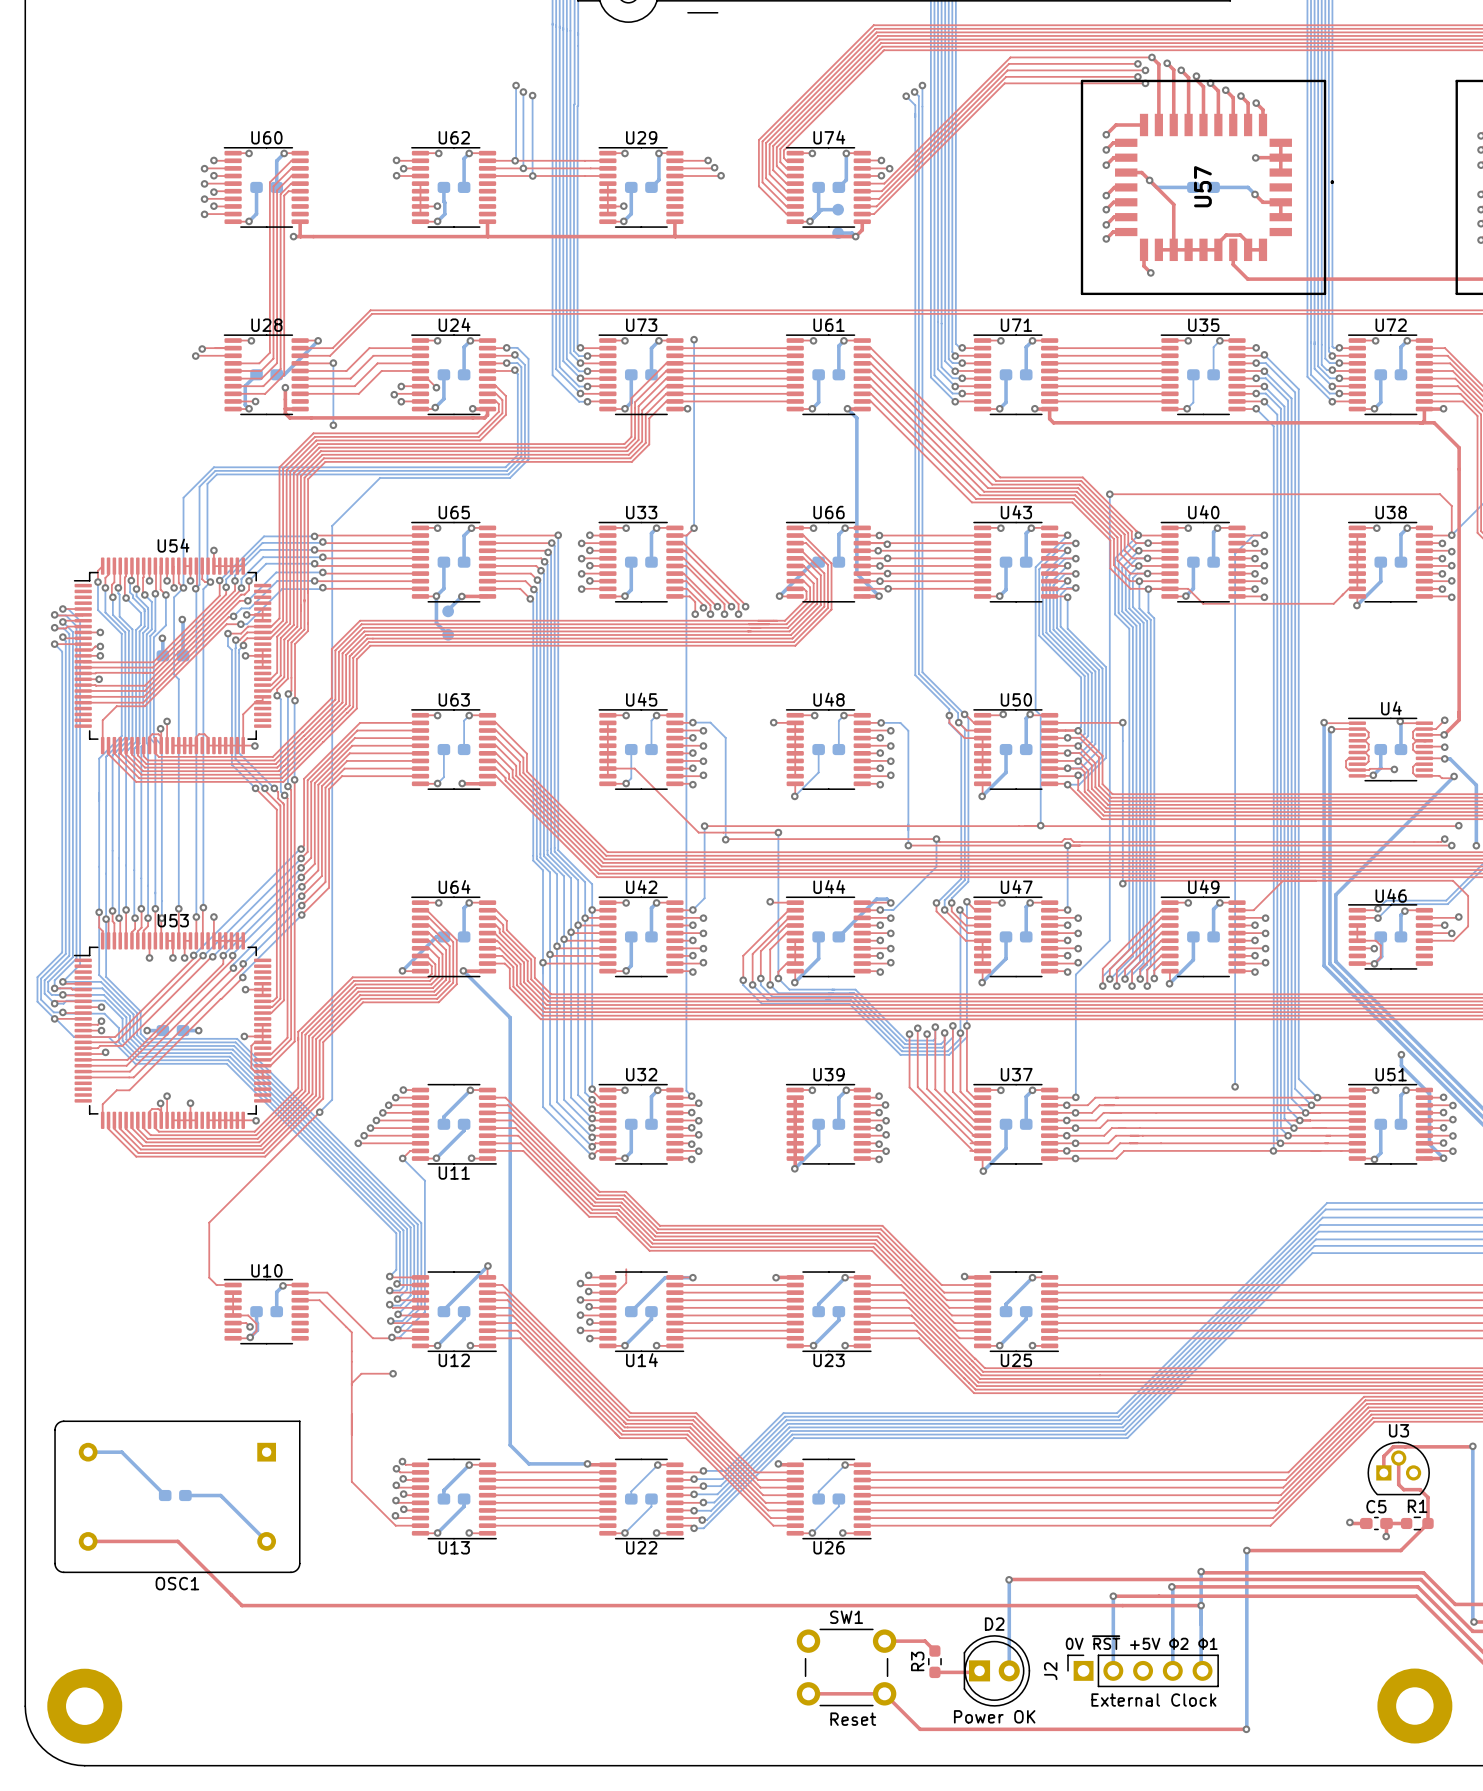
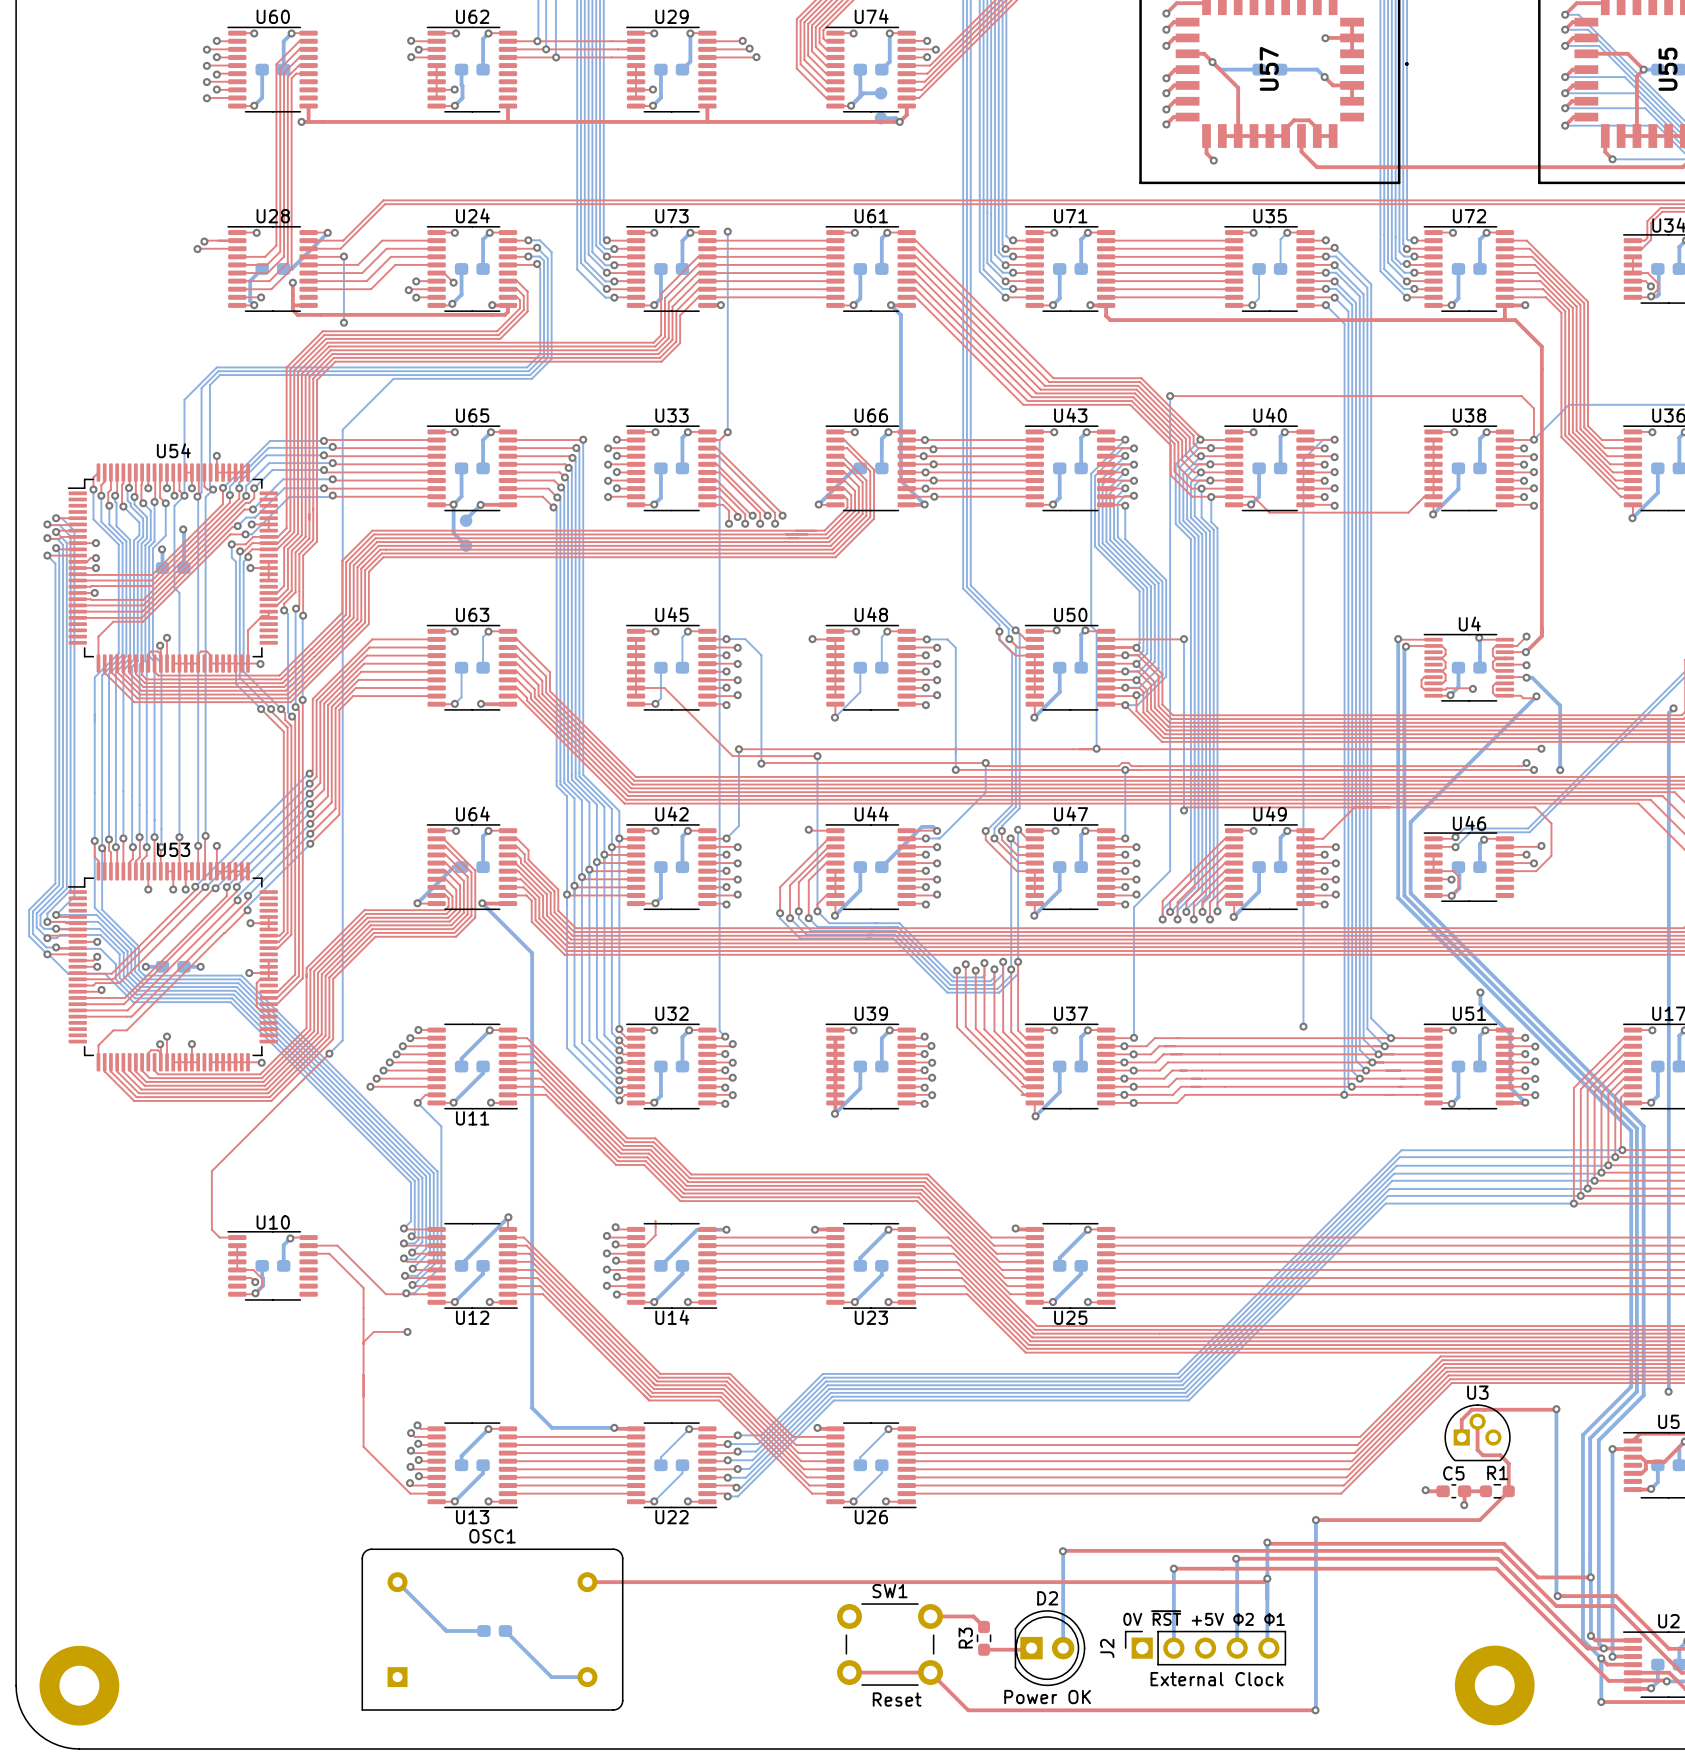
bottom track: (88, 1452) (121, 1452) (165, 1495) -> none
part: (175, 1495) -> none
bottom track: (185, 1495) (220, 1495) (266, 1541) -> none
OSC1 rotation: 0° (177, 1496) -> 180° (492, 1629)
OSC1 position: (177, 1496) -> (492, 1629)
top track: (88, 1541) (177, 1541) (242, 1605) (1201, 1605) -> (587, 1582) (1263, 1582) (1267, 1578)
bottom track: none -> (397, 1582) (446, 1631) (483, 1631)
part: none -> (494, 1631)
bottom track: none -> (505, 1631) (551, 1677) (587, 1677)

